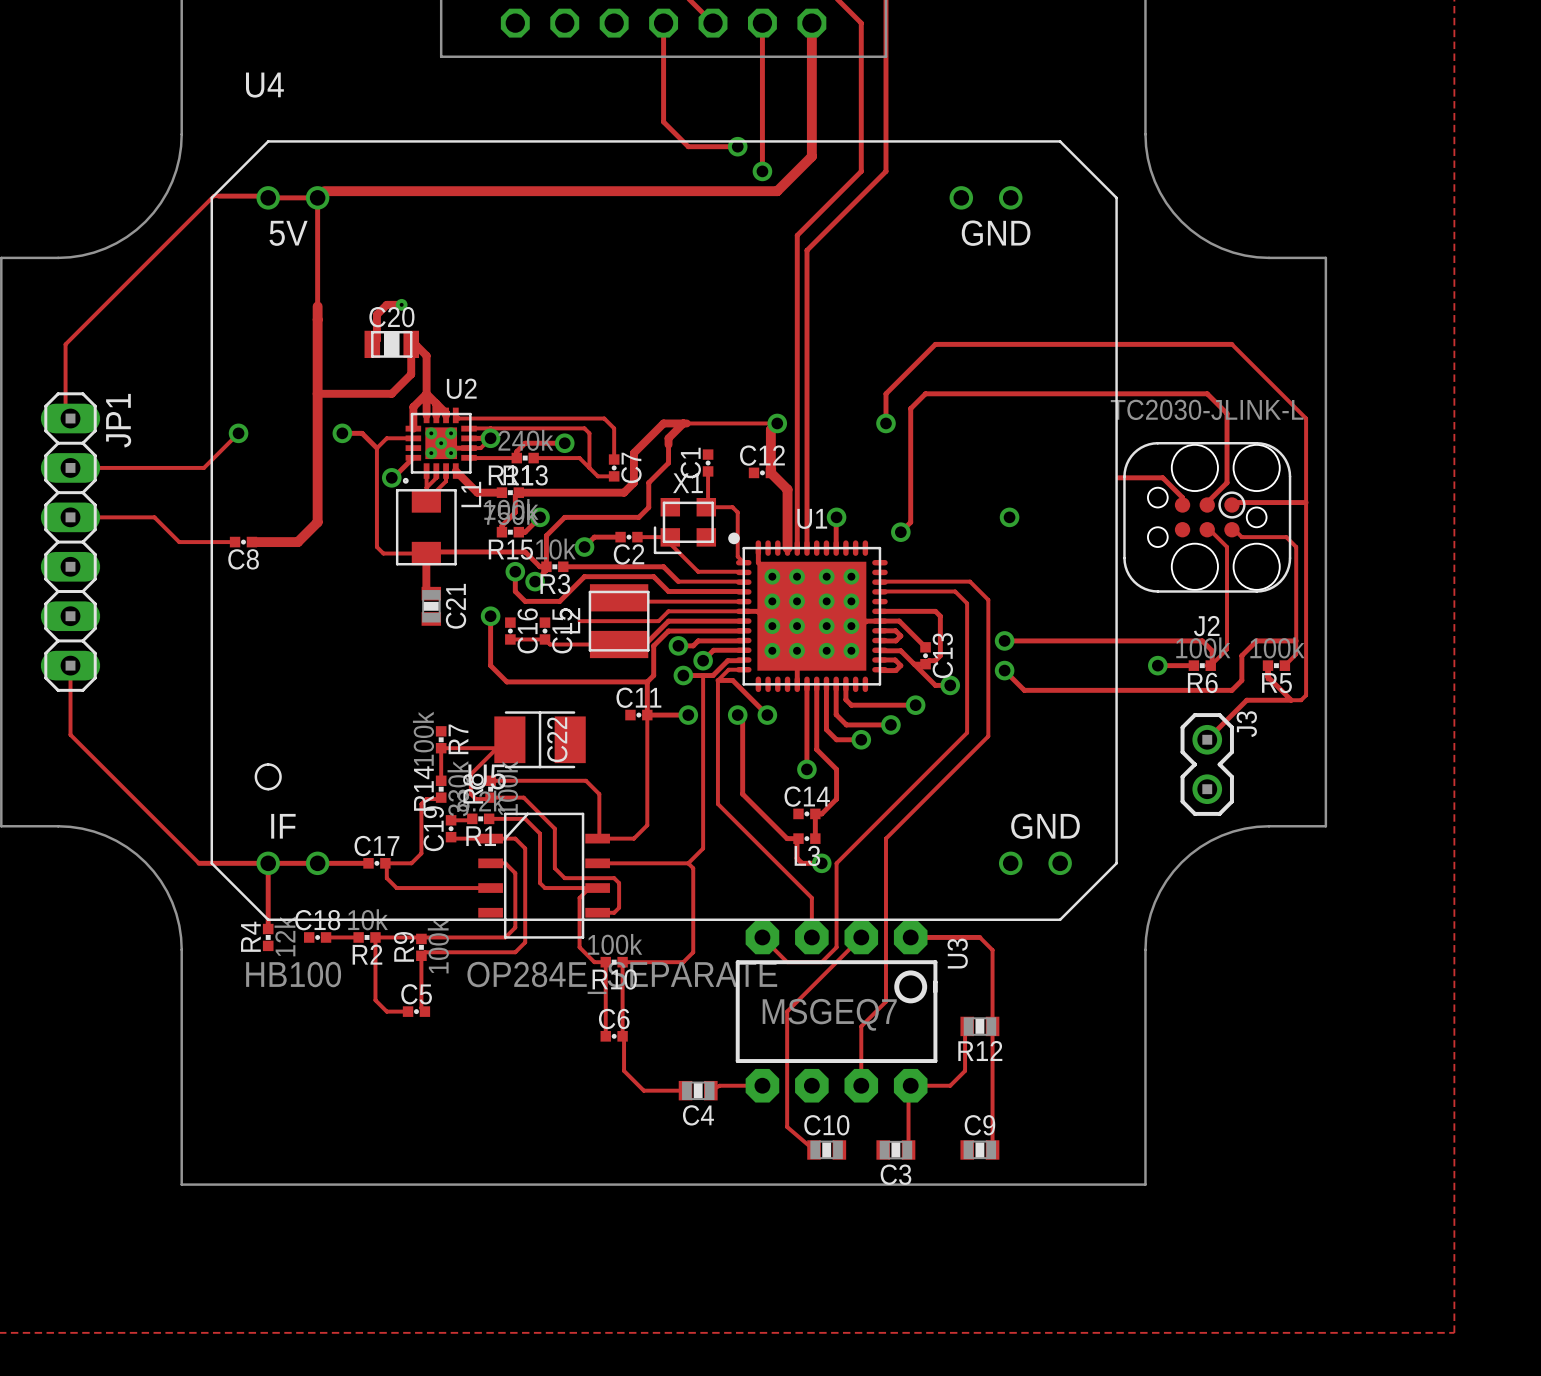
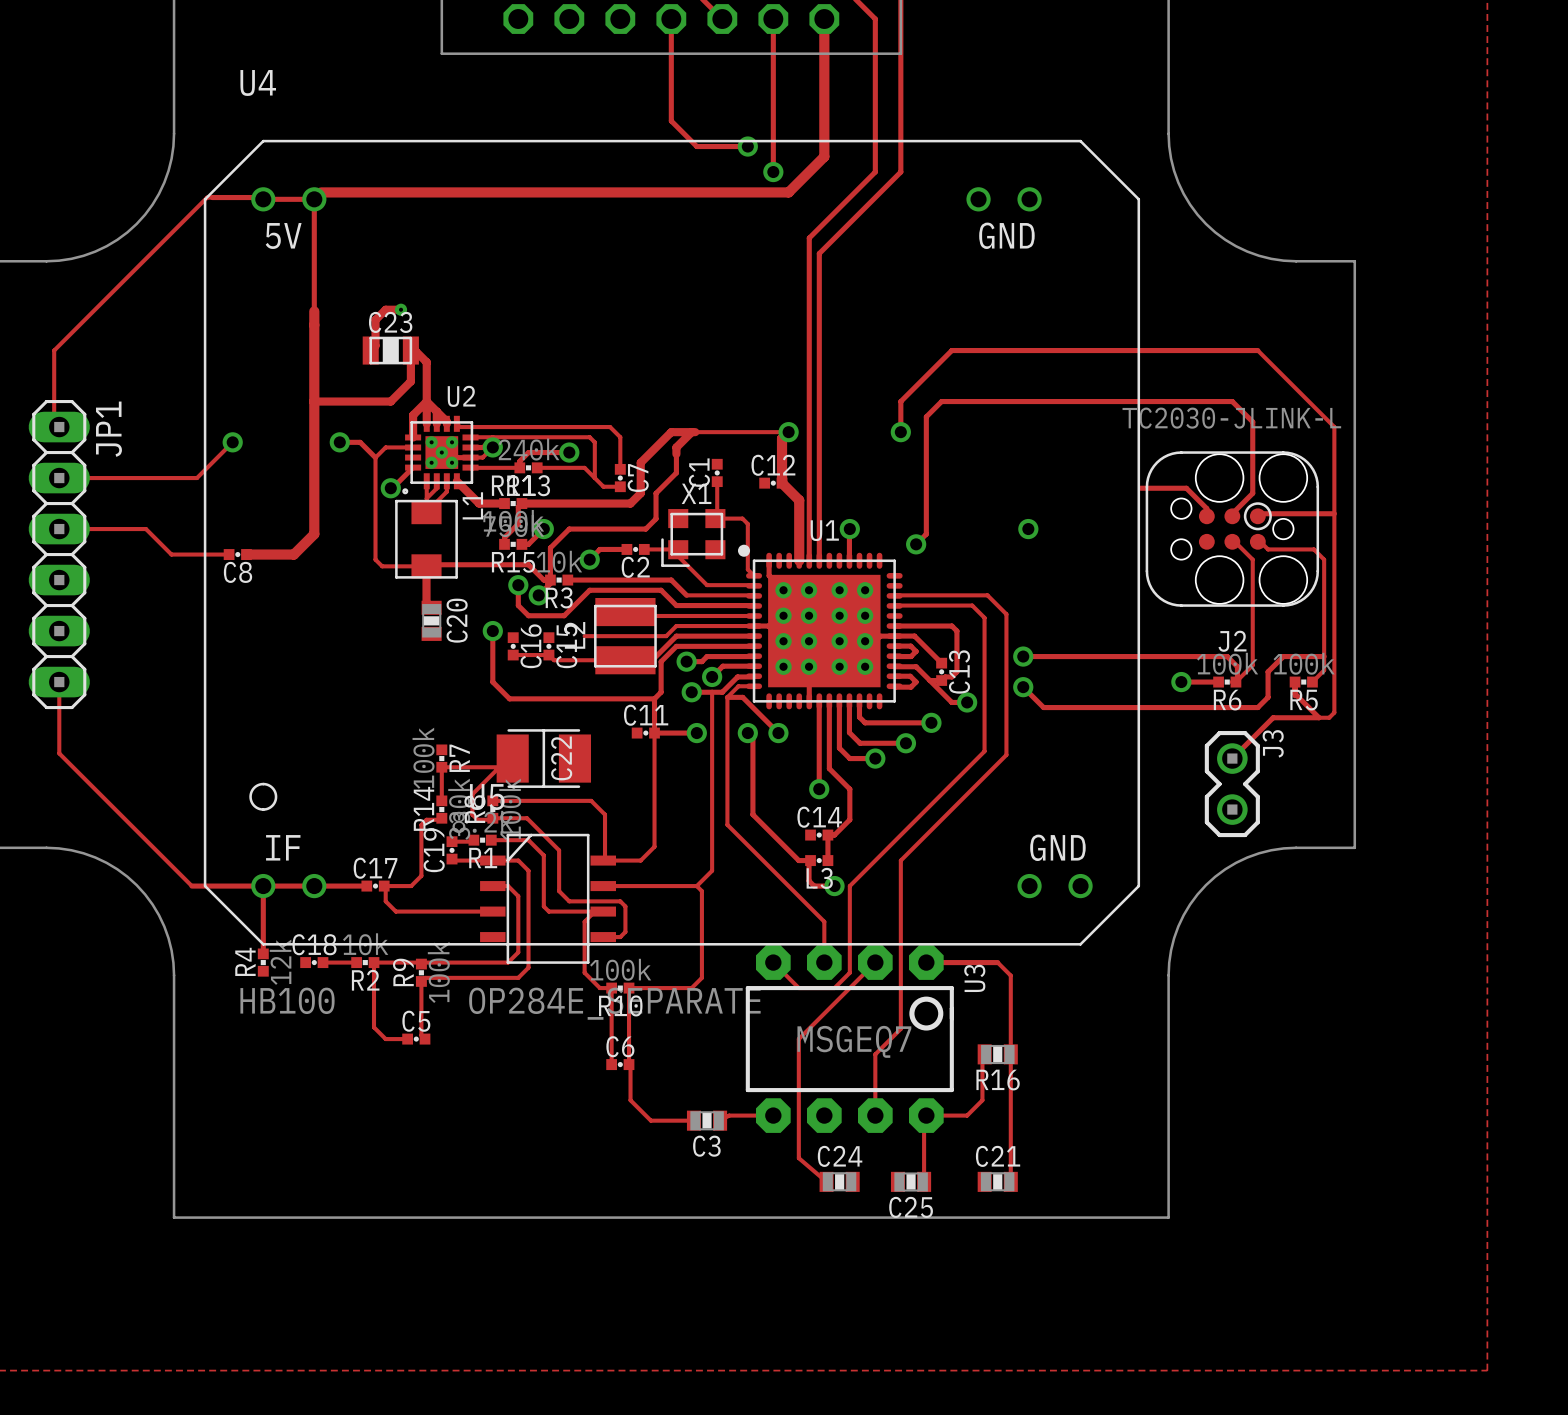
C20 name: C20 (391, 317) -> C23 (390, 322)
C21 name: C21 (456, 606) -> C20 (457, 620)
R12 name: R12 (980, 1050) -> R16 (998, 1080)
C4 name: C4 (698, 1115) -> C3 (706, 1146)
C10 name: C10 (826, 1125) -> C24 (840, 1156)
C9 name: C9 (979, 1125) -> C21 (998, 1156)
C3 name: C3 (895, 1174) -> C25 (911, 1207)

